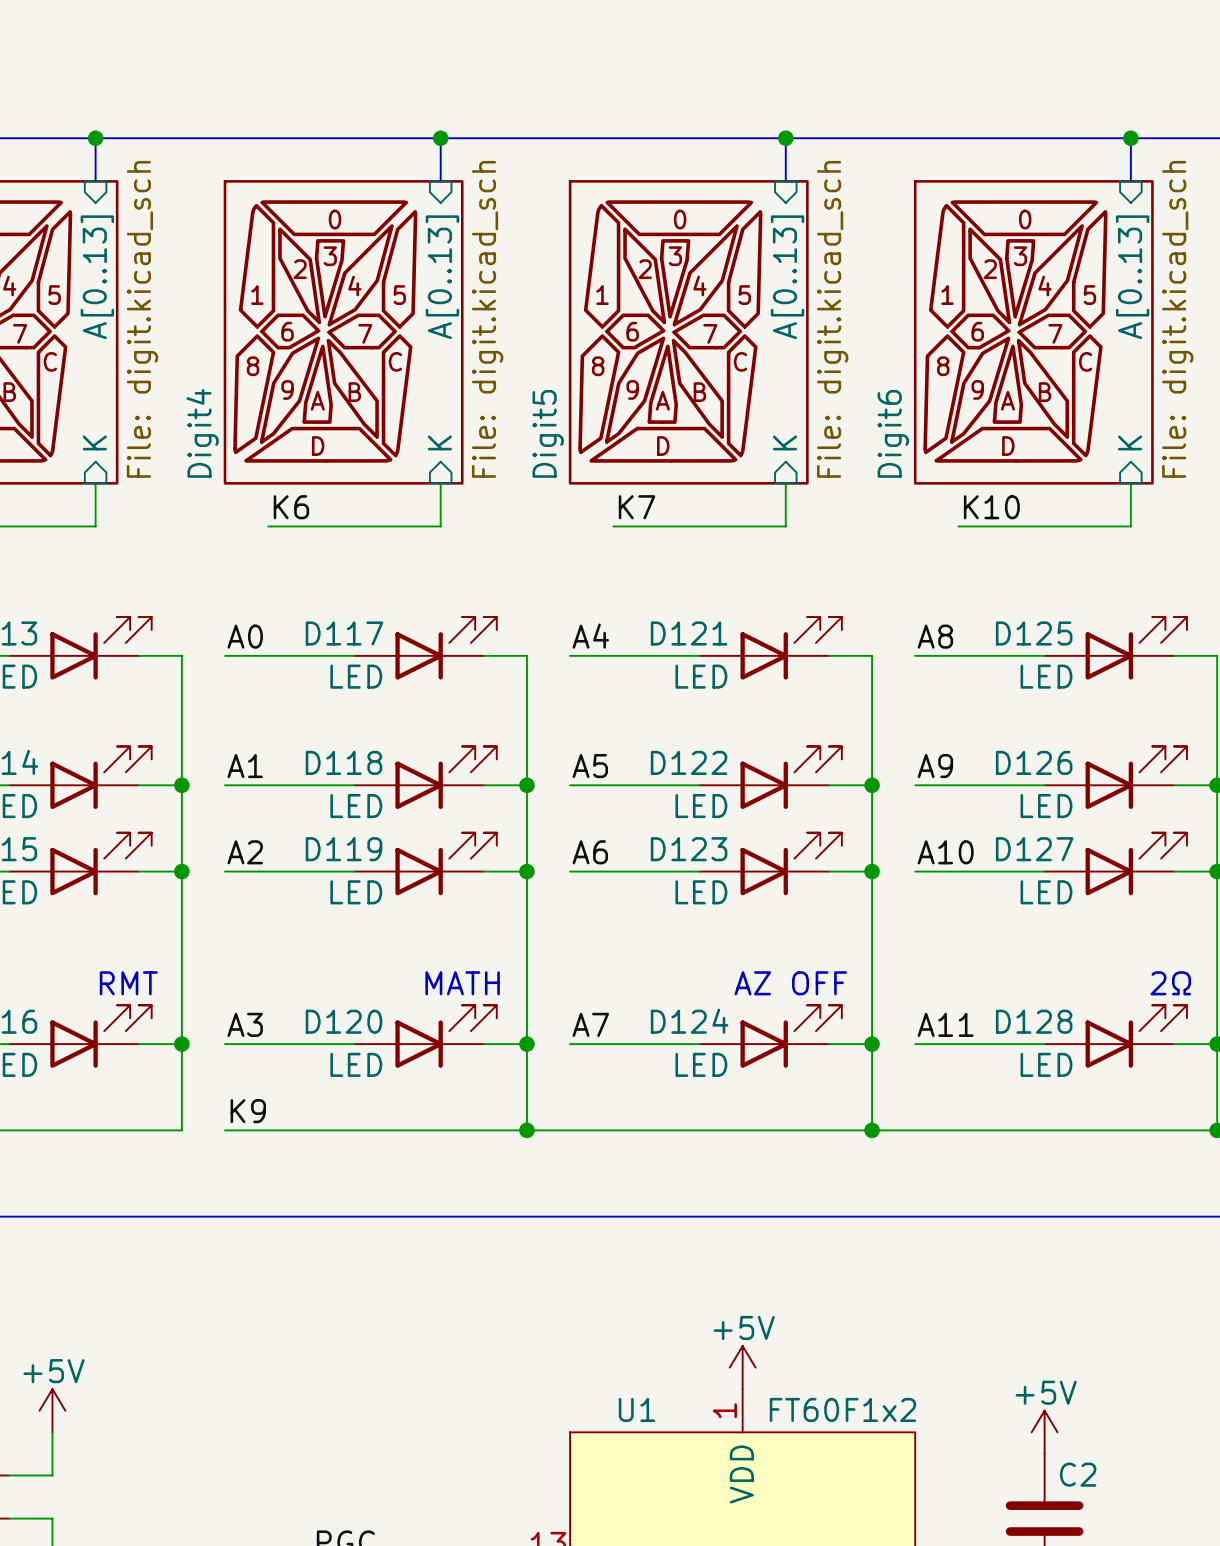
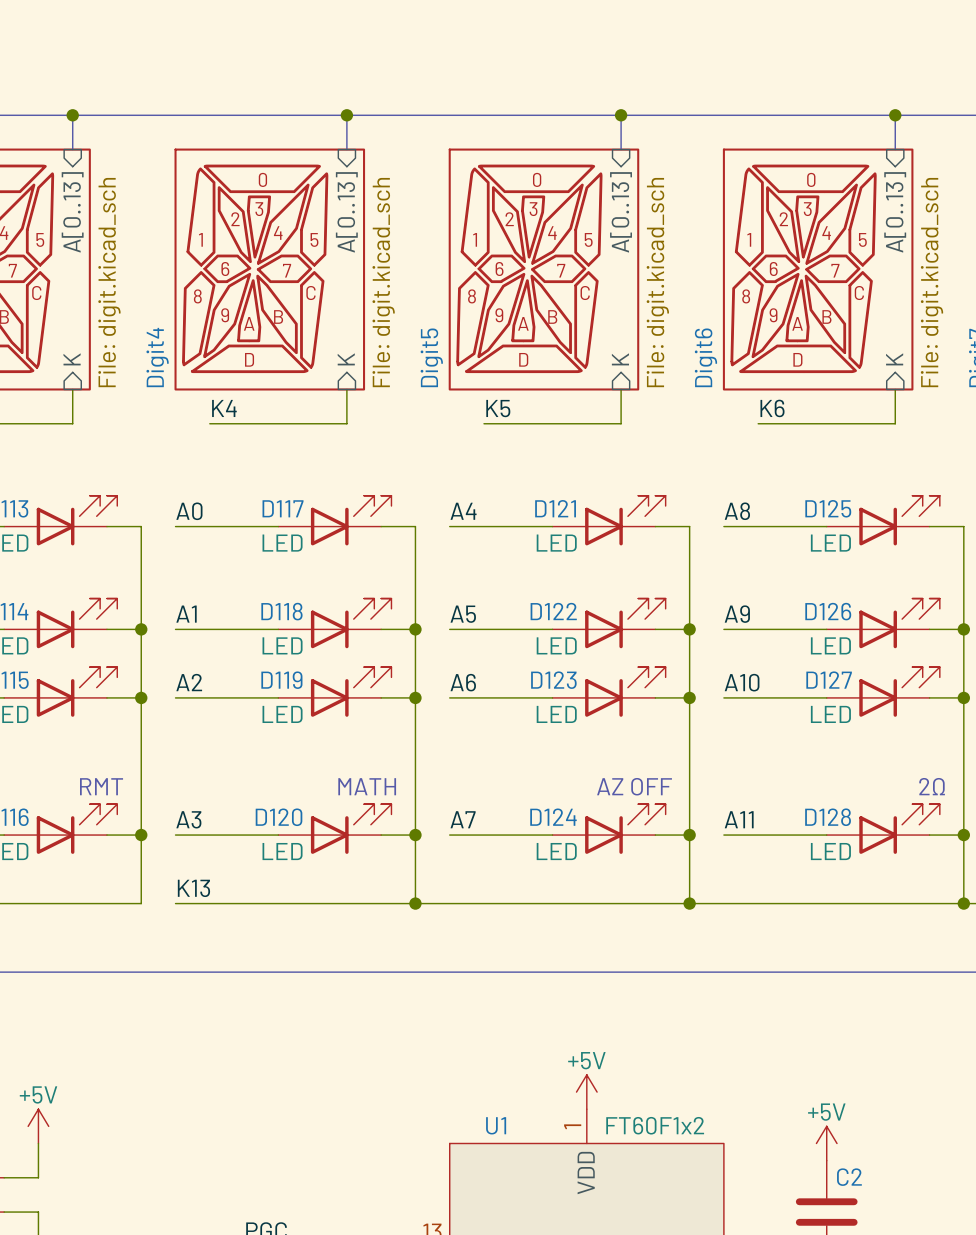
label: K6 (291, 507) -> K4 (224, 408)
label: K7 (637, 507) -> K5 (498, 408)
label: K10 (991, 507) -> K6 (772, 408)
label: K9 (248, 1111) -> K13 (193, 888)

